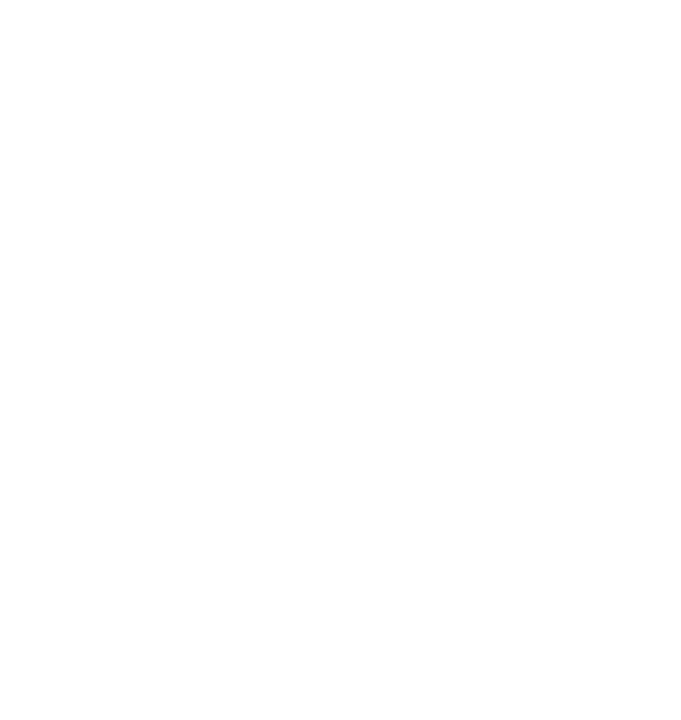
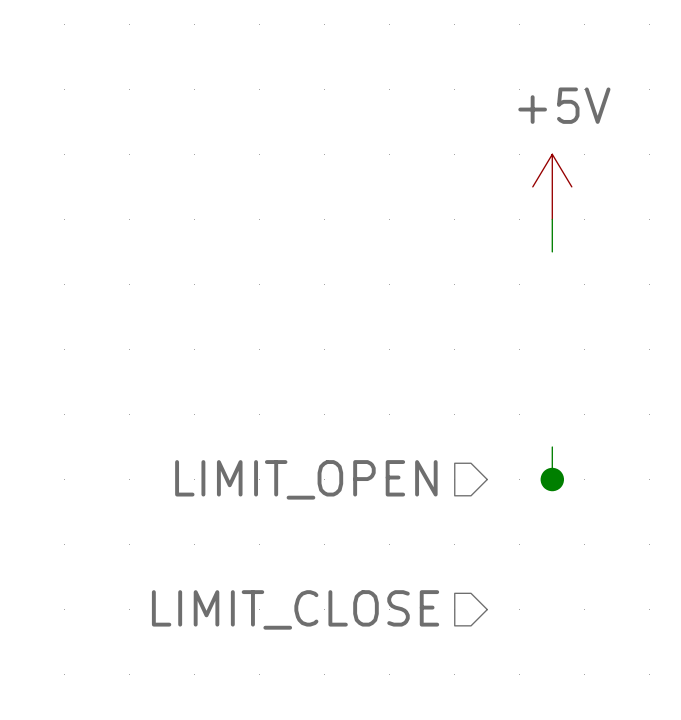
power symbol: none -> +5V (552, 186)
wire: none -> (552, 219) (552, 251)
wire: none -> (552, 447) (552, 479)
hierarchical label: none -> LIMIT_OPEN (306, 479)
junction: none -> (552, 479)
hierarchical label: none -> LIMIT_CLOSE (295, 609)

